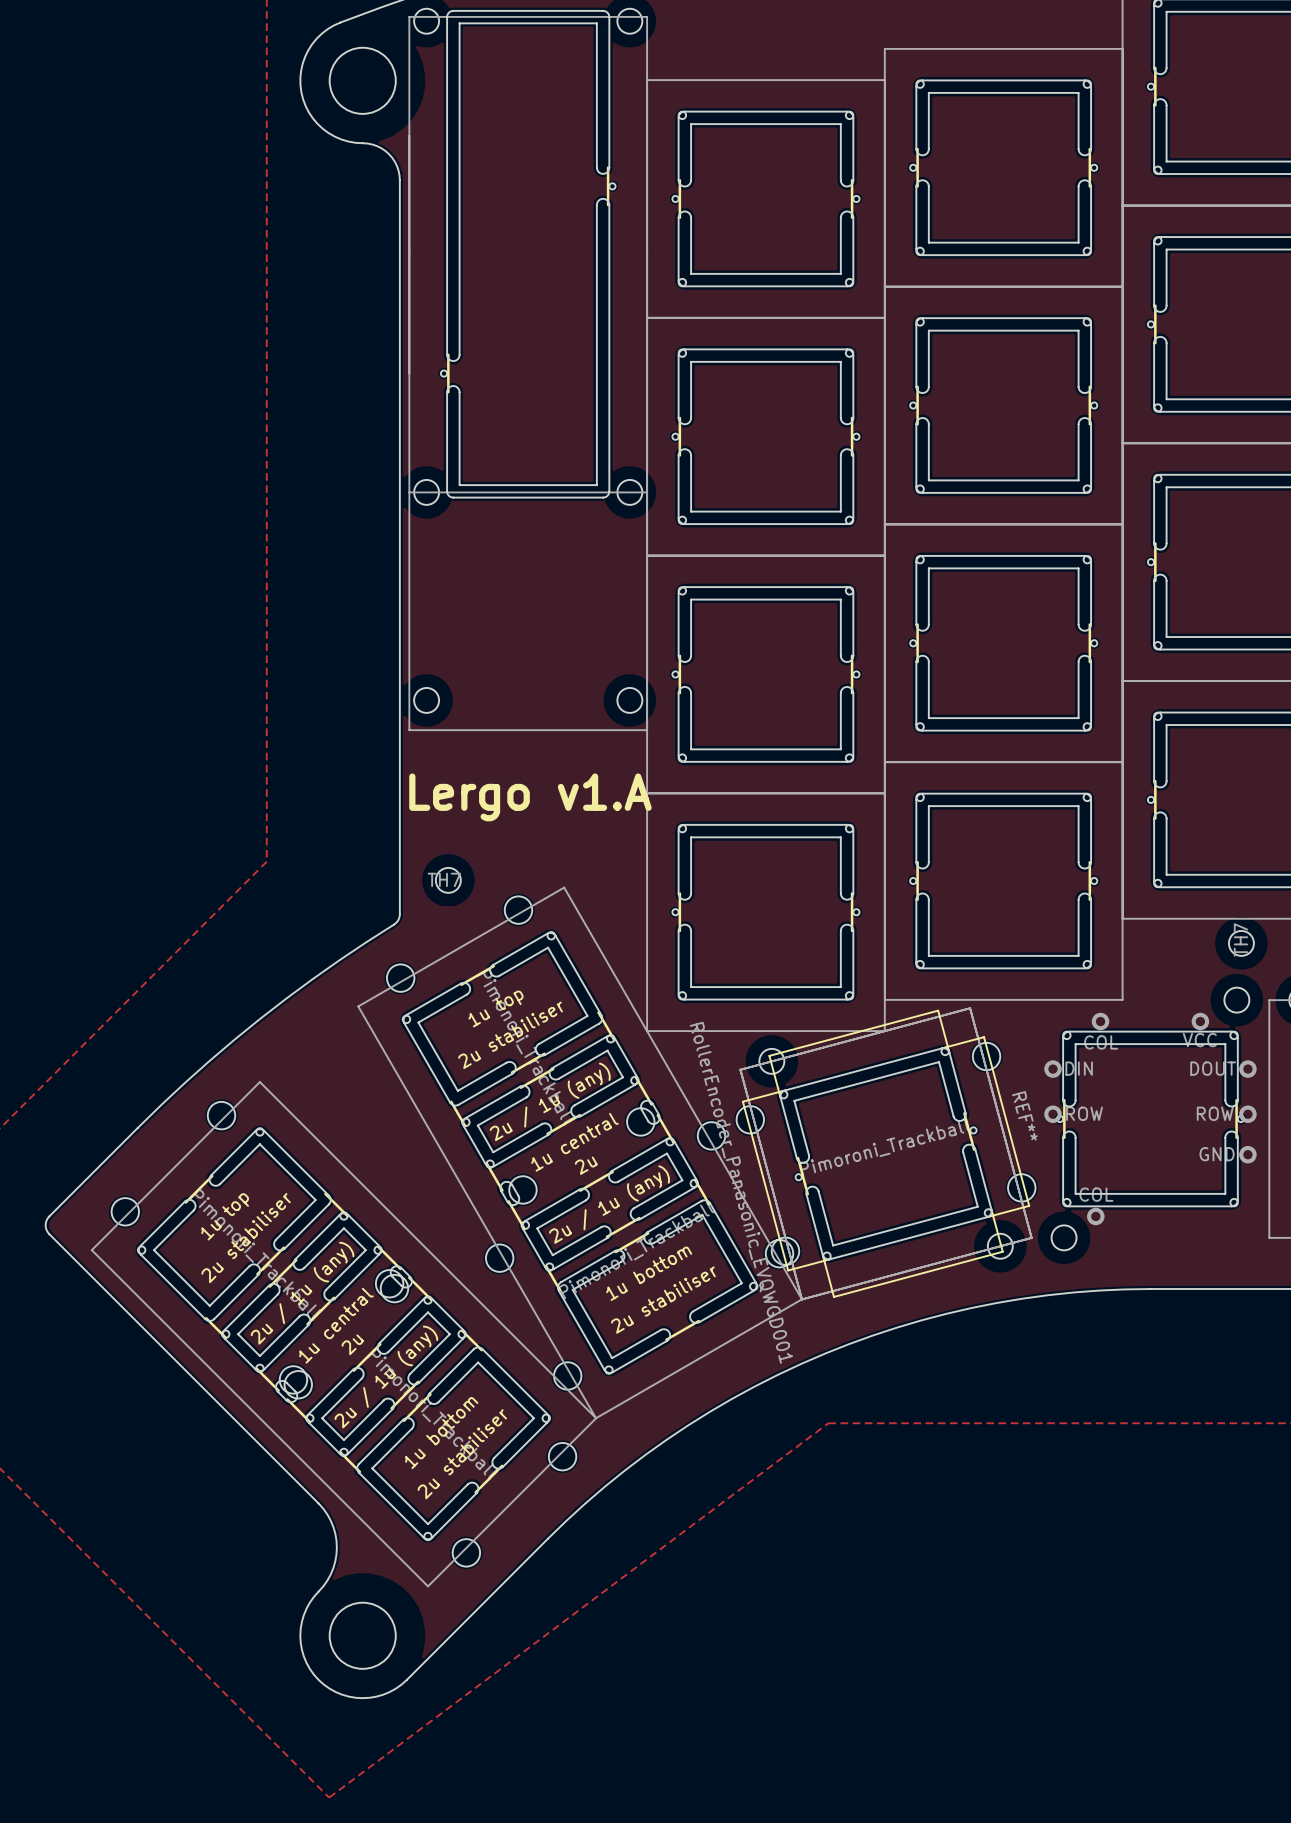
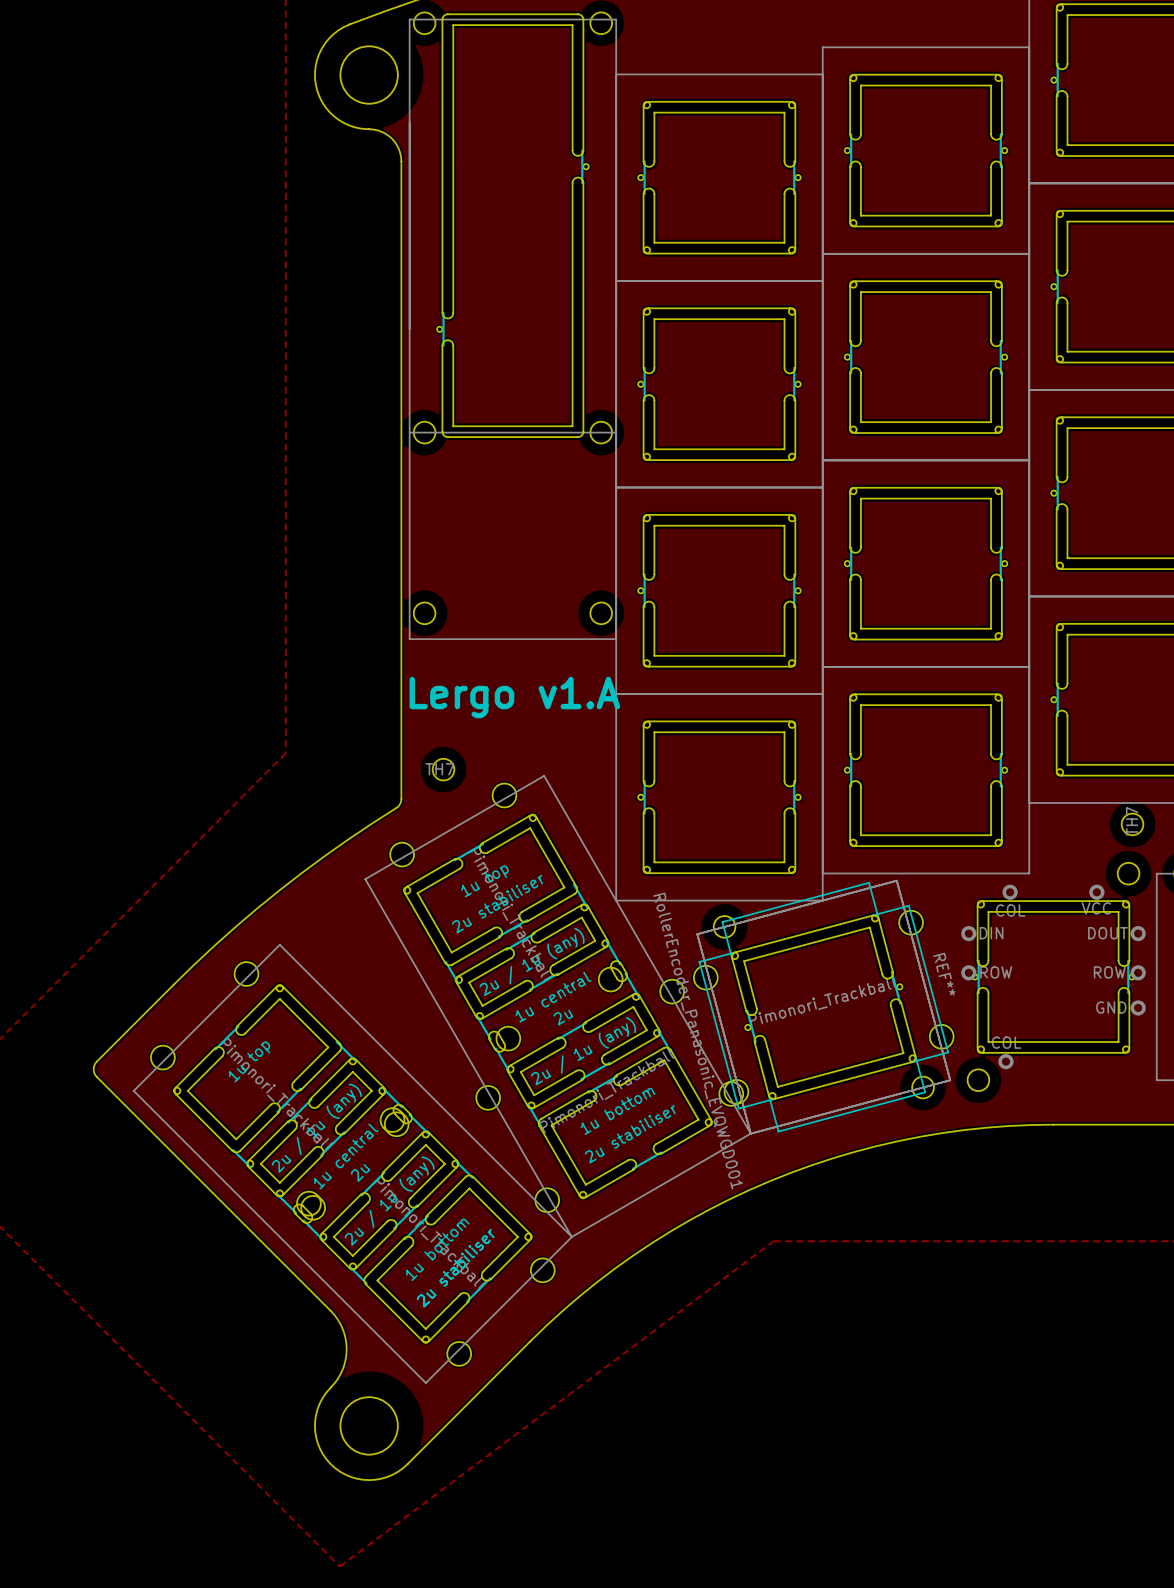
part footprint: [90, 1081, 598, 1588] -> [132, 944, 573, 1384]
part value: Pimoroni_Trackball (884, 1147) -> Pimonori_Trackball (822, 1001)

